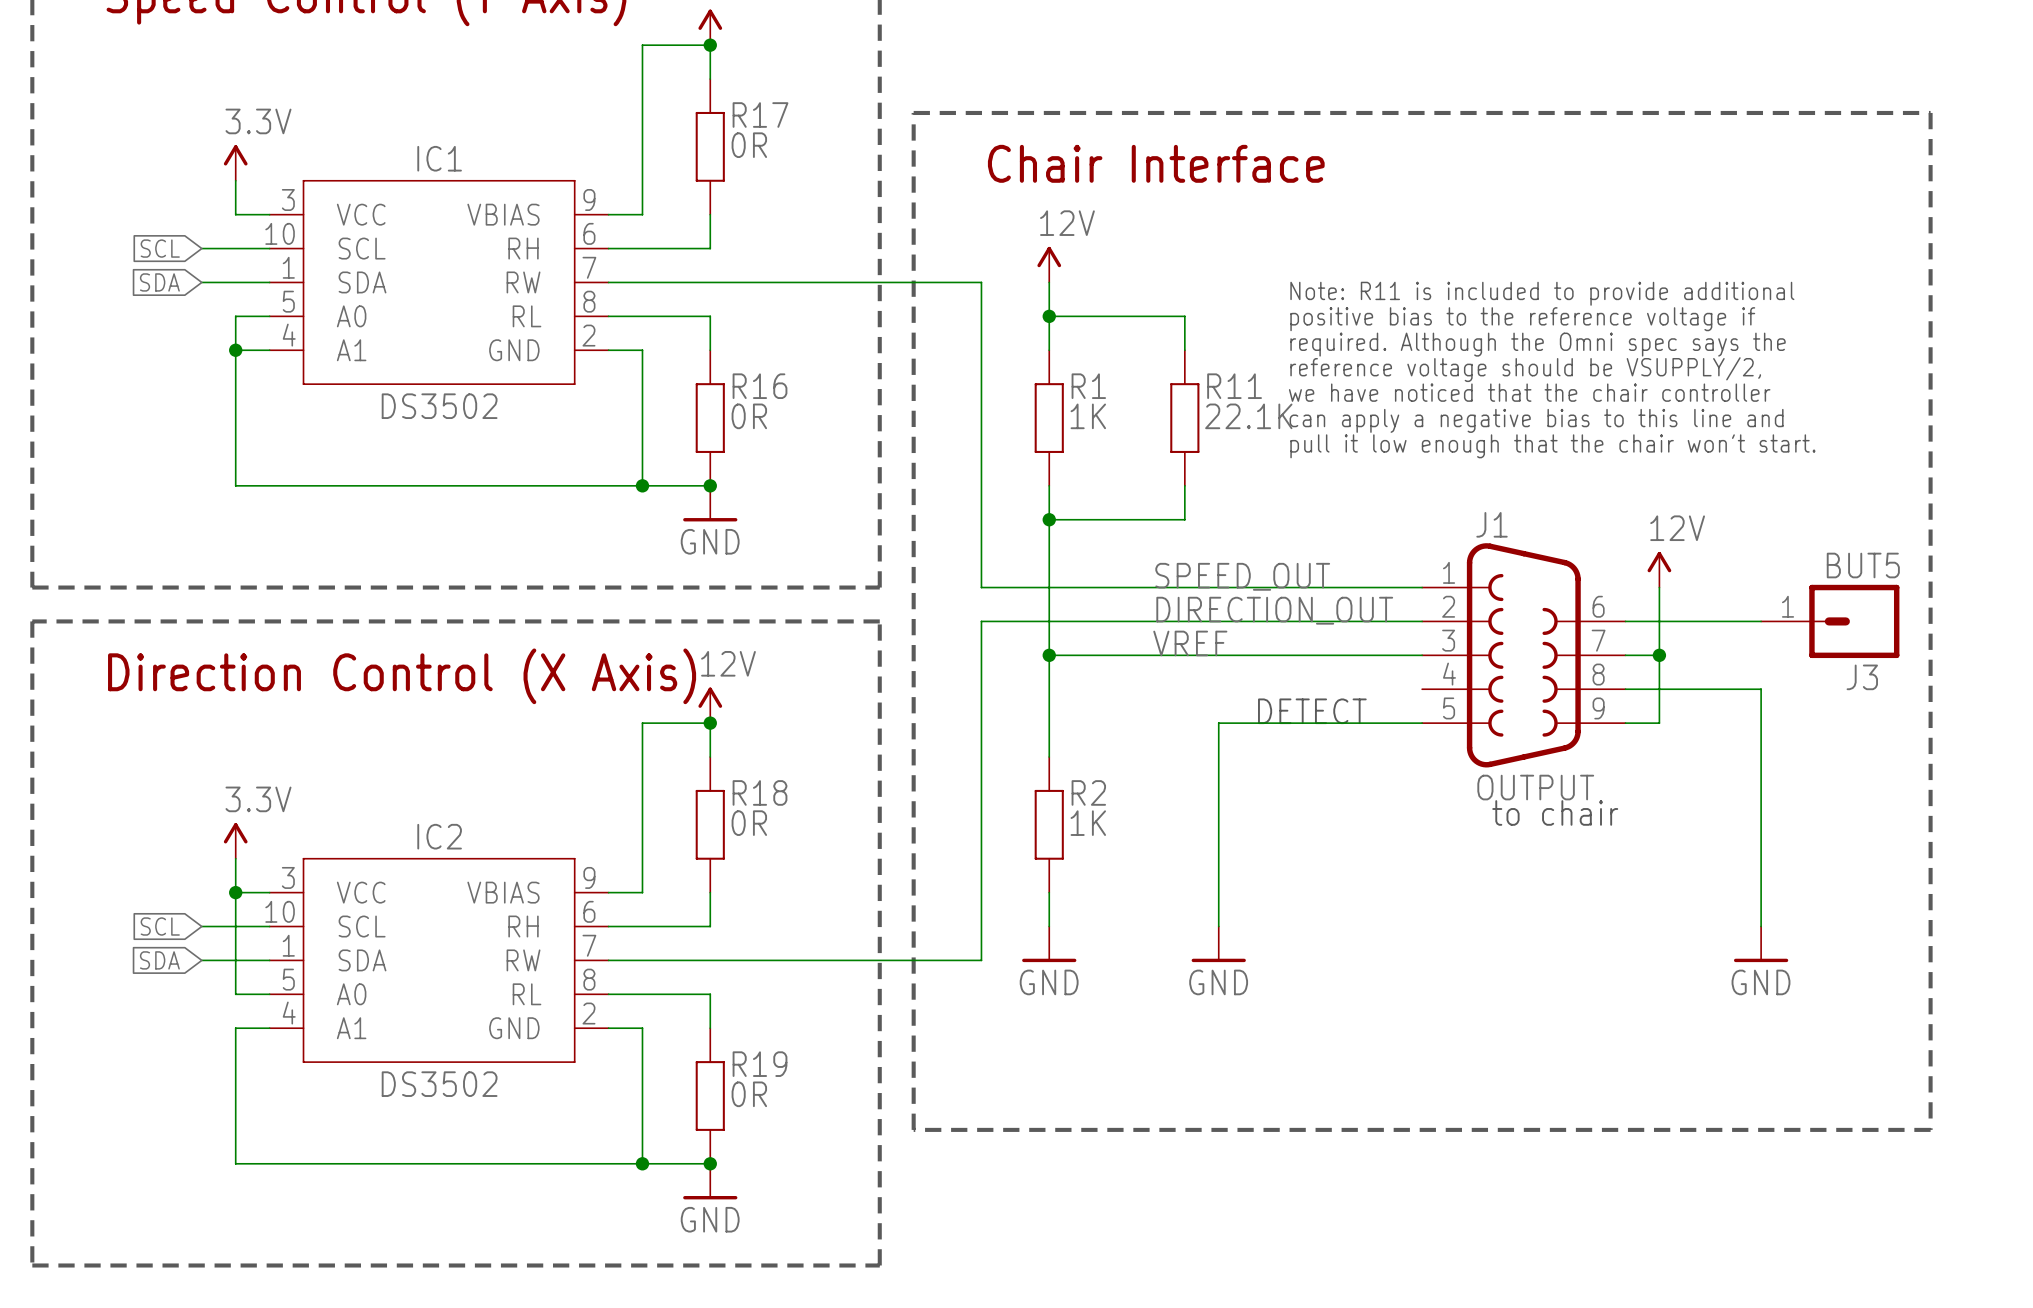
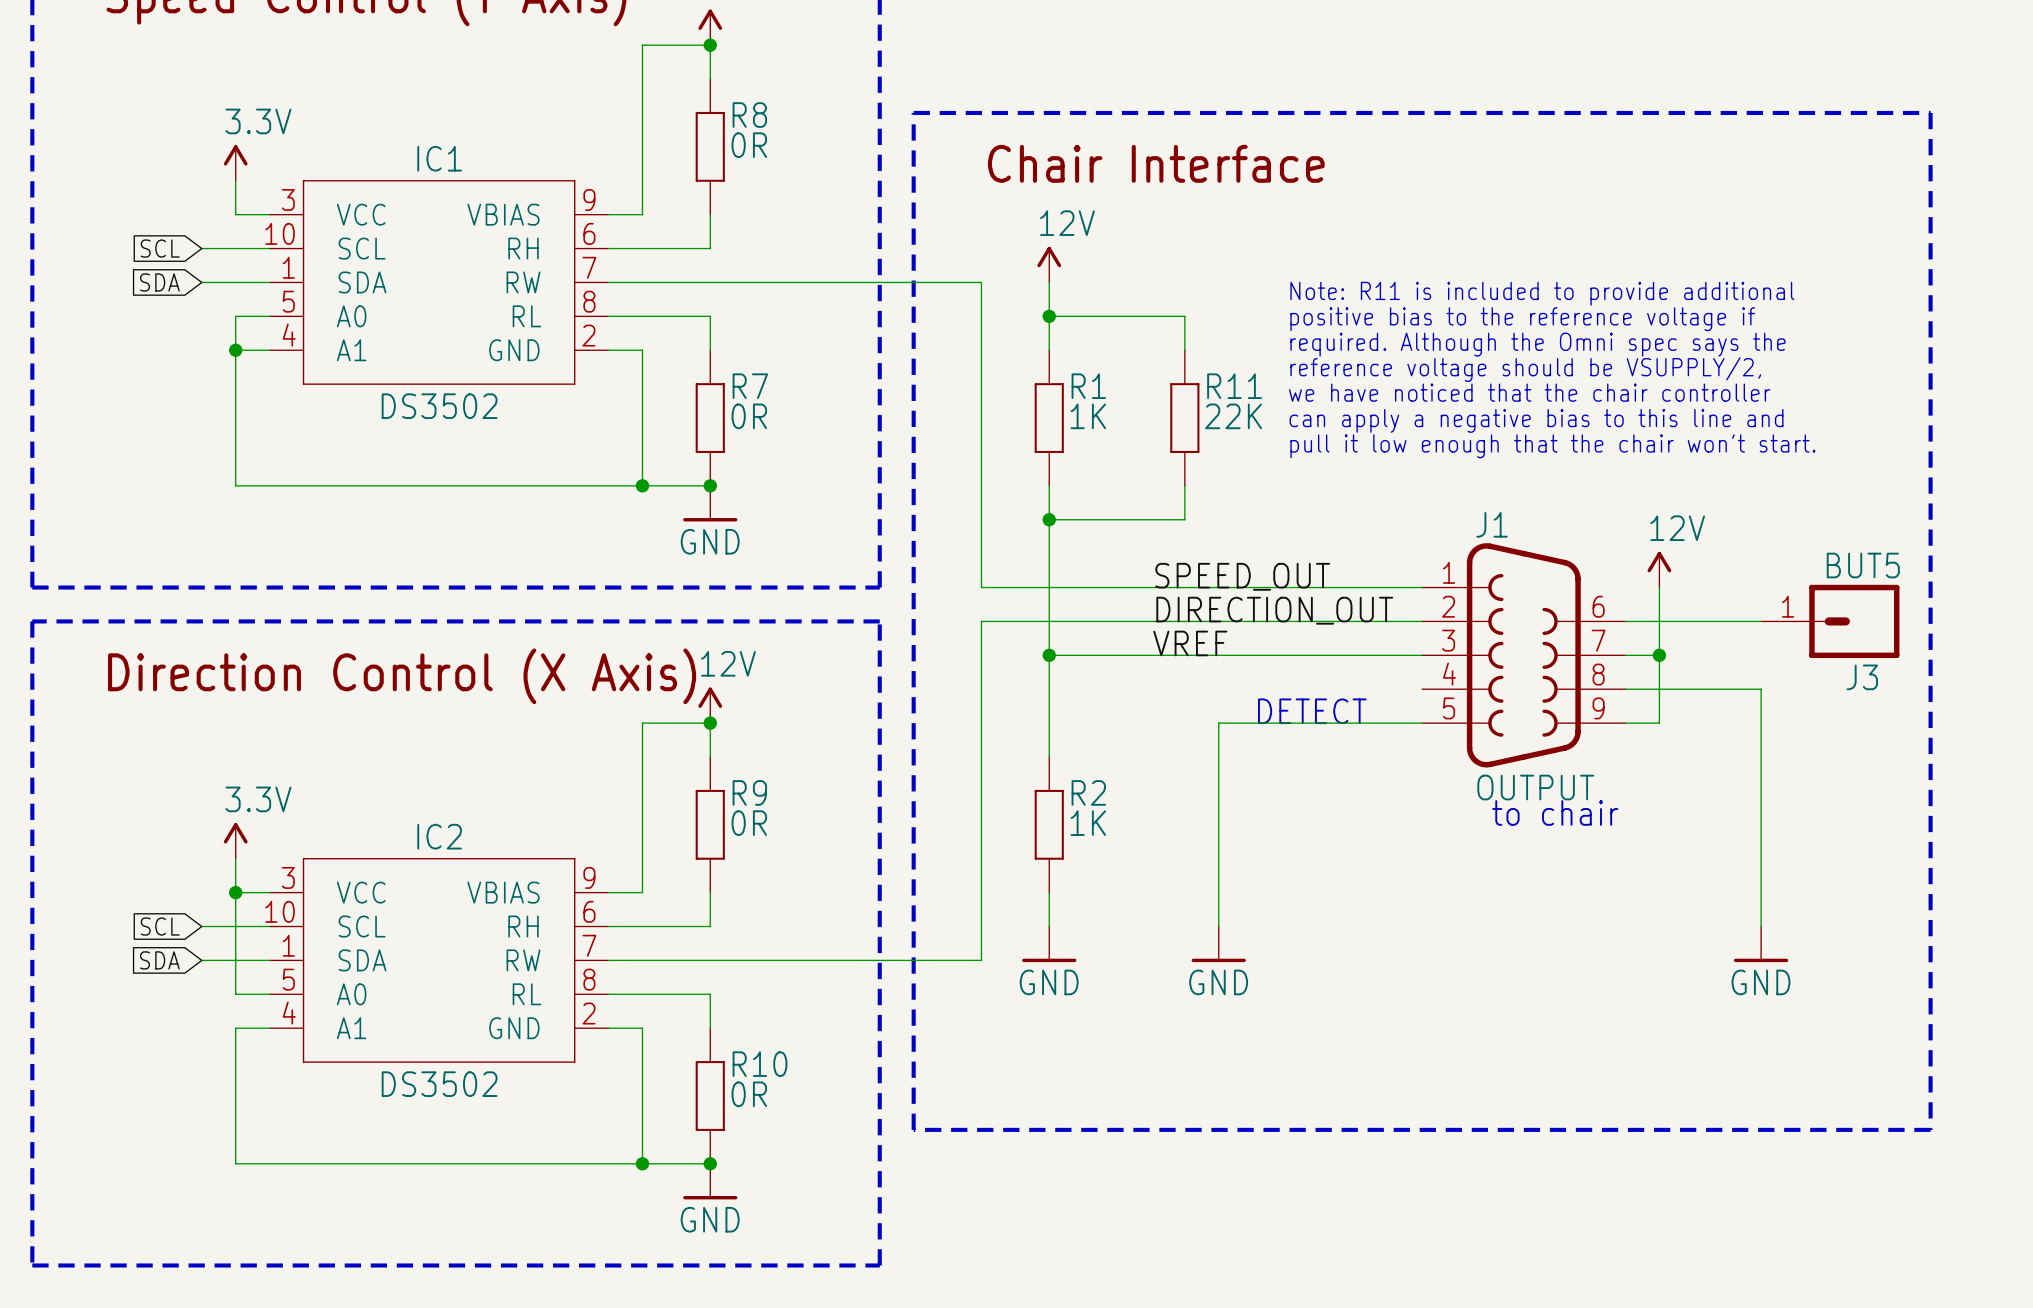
R17 name: R17 (760, 115) -> R8 (749, 115)
R16 name: R16 (760, 386) -> R7 (750, 386)
R11 value: 22.1K (1248, 416) -> 22K (1233, 416)
R18 name: R18 (760, 792) -> R9 (749, 792)
R19 name: R19 (760, 1064) -> R10 (760, 1064)

